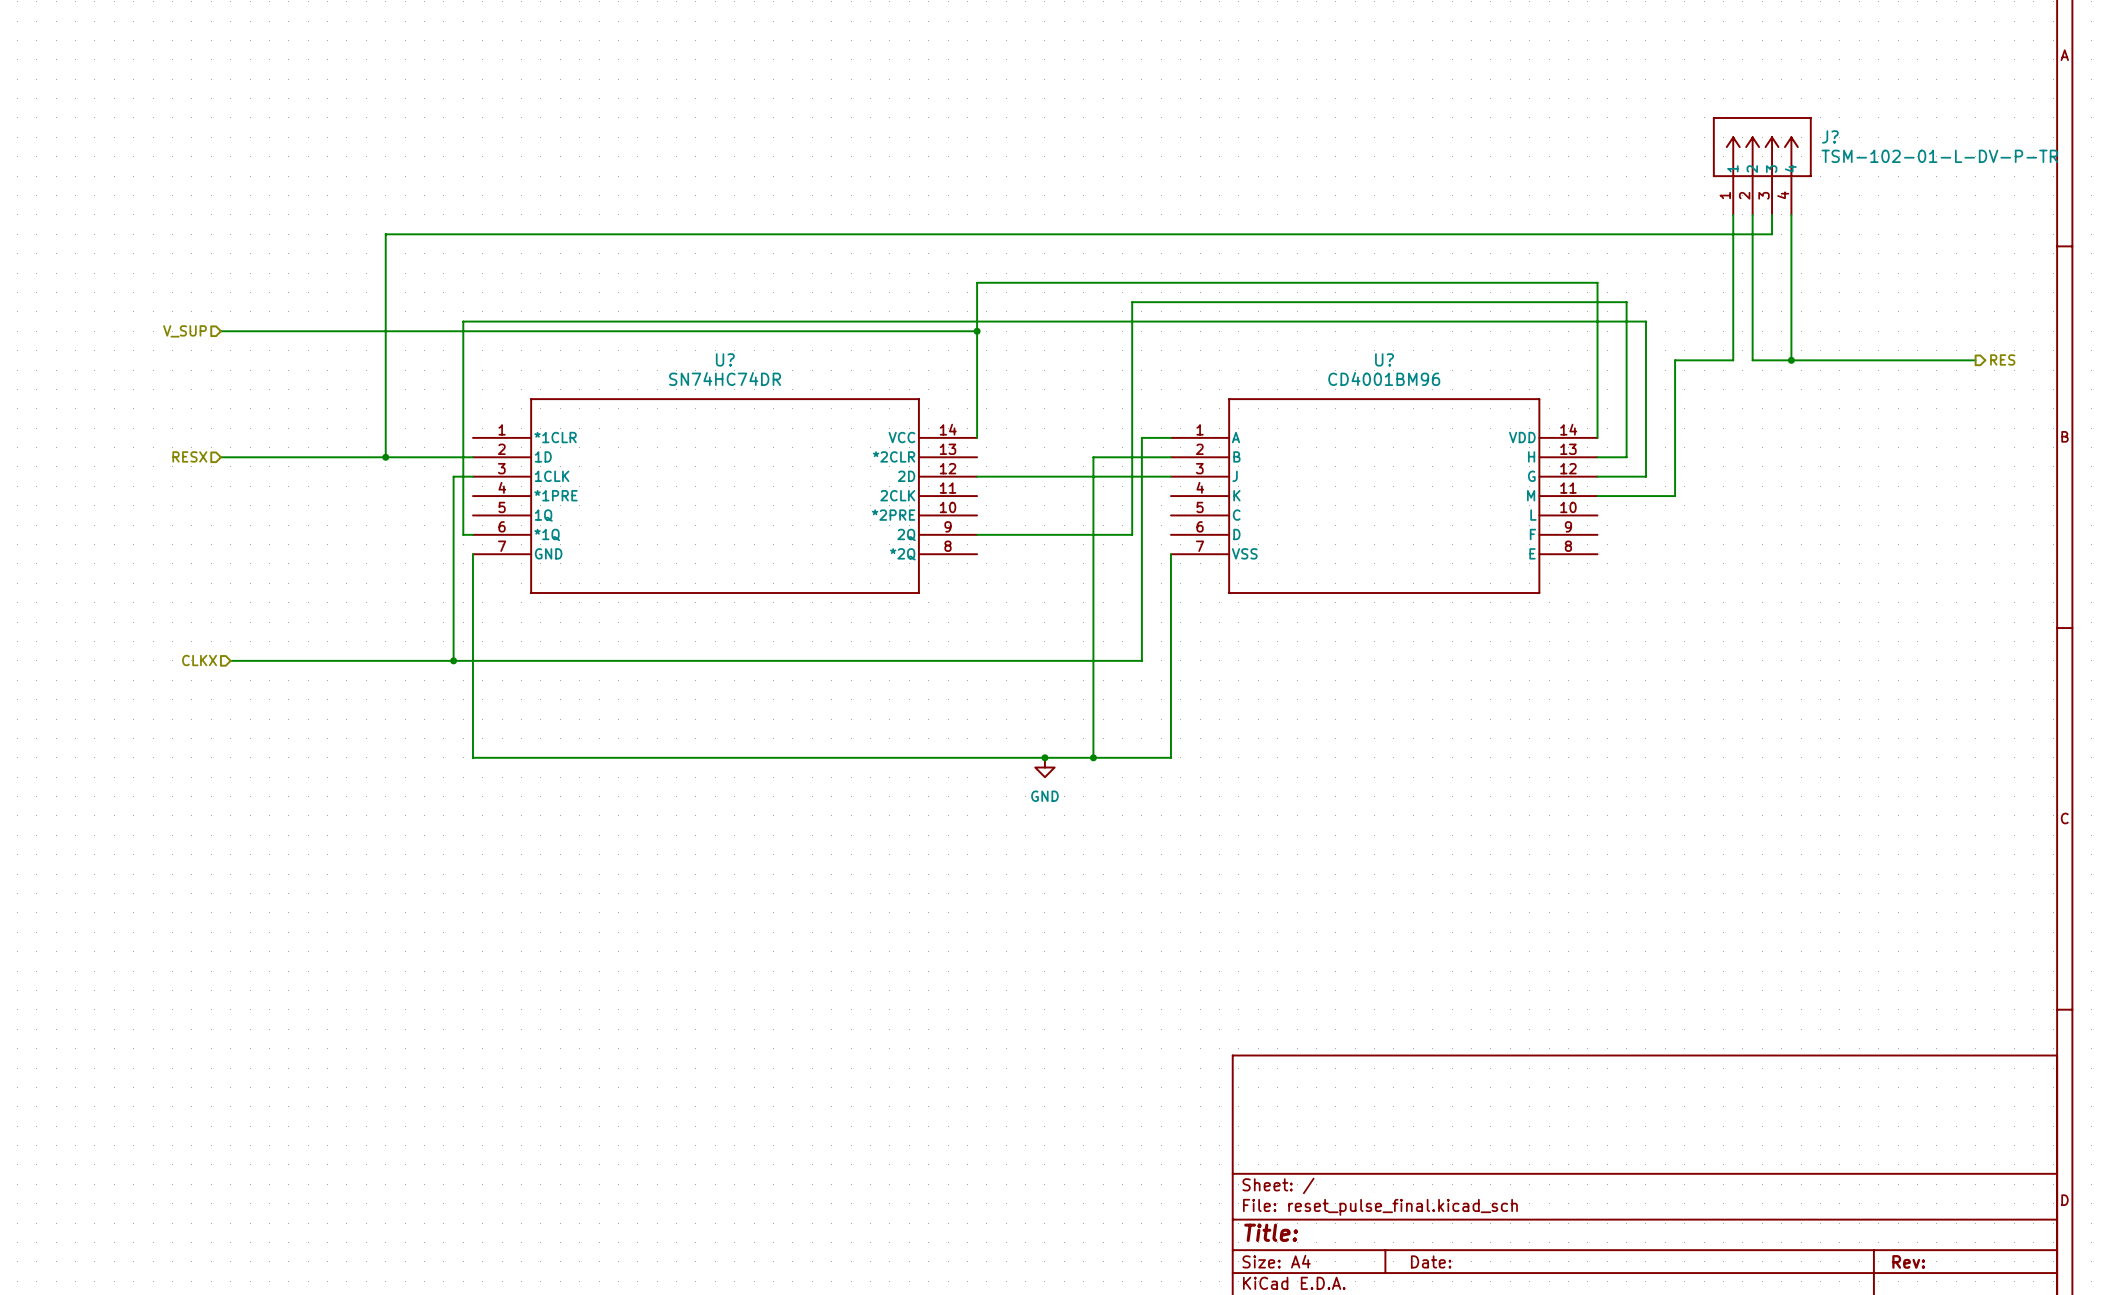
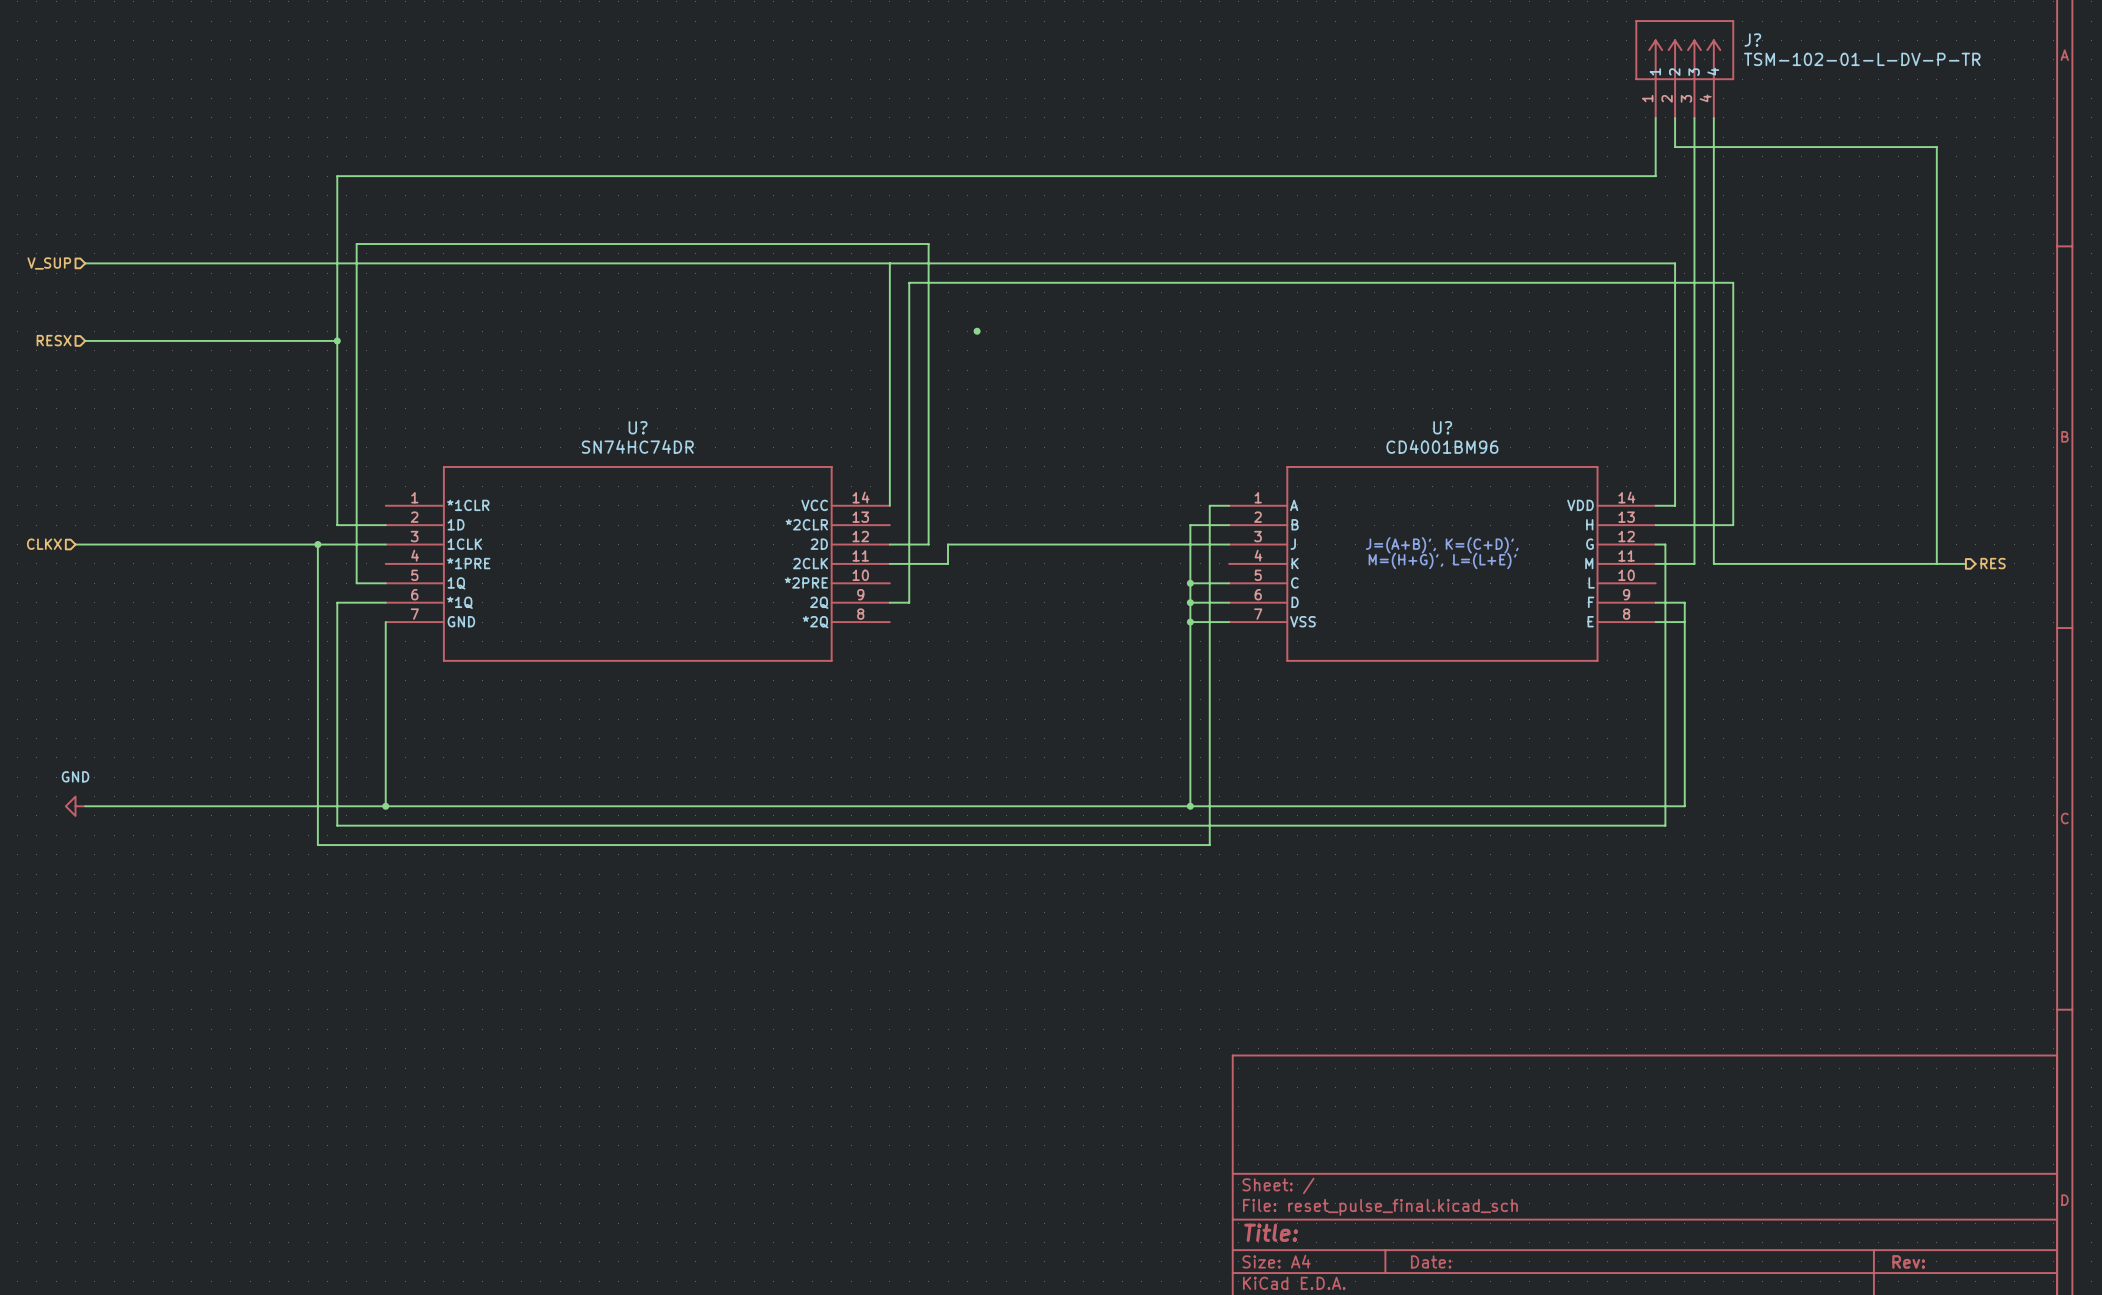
wire: none -> (1655, 117) (1655, 176) (337, 176) (337, 525) (385, 525)
wire: none -> (1675, 117) (1675, 147) (1936, 147) (1936, 563)
wire: none -> (1694, 117) (1694, 563) (1655, 563)
wire: none -> (1713, 117) (1713, 563) (1965, 563)
J? position: (1762, 166) -> (1684, 69)
wire: (1733, 214) (1733, 282) -> (1597, 282) (1733, 282)
wire: (1752, 214) (1752, 360) (1975, 360) -> none
wire: (1772, 214) (1772, 234) (385, 234) (385, 457) -> none
wire: (1791, 214) (1791, 360) -> none
wire: none -> (85, 263) (1675, 263) (1675, 360)
wire: none -> (889, 263) (889, 505)
wire: (977, 282) (977, 437) -> (977, 282) (909, 282) (909, 602) (889, 602)
wire: (1597, 282) (1597, 437) -> none
hierarchical label position: V_SUP (185, 331) -> V_SUP (49, 263)
wire: (220, 331) (977, 331) -> none
junction: none -> (337, 340)
hierarchical label: RES (2002, 359) -> none
wire: (1675, 360) (1733, 360) -> (1655, 525) (1733, 525) (1733, 360)
junction: (1791, 360) -> none
wire: (1170, 437) (1141, 437) (1141, 660) (230, 660) -> none
hierarchical label position: RESX (189, 456) -> RESX (54, 340)
wire: (220, 457) (472, 457) -> (85, 340) (337, 340)
junction: (385, 457) -> none
wire: (1170, 457) (1093, 457) (1093, 757) -> none
wire: (1597, 457) (1626, 457) (1626, 302) (1132, 302) (1132, 534) (977, 534) -> none
wire: (472, 476) (453, 476) (453, 660) -> none
wire: (977, 476) (1170, 476) -> none
wire: (1597, 476) (1645, 476) (1645, 321) (463, 321) (463, 534) (472, 534) -> none
U? position: (725, 496) -> (637, 563)
U? position: (1384, 496) -> (1442, 563)
wire: (1597, 496) (1675, 496) -> (1655, 505) (1675, 505) (1675, 496)
wire: none -> (1229, 505) (1209, 505) (1209, 845) (317, 845) (317, 544)
wire: none -> (1229, 525) (1190, 525) (1190, 806)
hierarchical label: none -> CLKX (44, 544)
wire: none -> (75, 544) (385, 544)
junction: none -> (317, 544)
wire: none -> (889, 544) (928, 544) (928, 244) (356, 244) (356, 583) (385, 583)
wire: none -> (1229, 544) (948, 544) (948, 563) (889, 563)
wire: none -> (1655, 544) (1665, 544) (1665, 825) (337, 825) (337, 602) (385, 602)
text: none -> J=(A+B)', K=(C+D)', (1442, 545)
wire: (472, 554) (472, 757) (1170, 757) (1170, 554) -> none
text: none -> M=(H+G)', L=(L+E)' (1442, 560)
hierarchical label: none -> RES (1993, 563)
wire: none -> (1190, 583) (1229, 583)
junction: none -> (1190, 583)
wire: none -> (1190, 602) (1229, 602)
junction: none -> (1190, 602)
wire: none -> (1655, 602) (1684, 602) (1684, 806) (85, 806)
wire: none -> (385, 622) (385, 806)
wire: none -> (1190, 622) (1229, 622)
junction: none -> (1190, 622)
wire: none -> (1655, 622) (1684, 622)
hierarchical label: CLKX (199, 660) -> none
junction: (453, 660) -> none
junction: (1044, 757) -> none
junction: (1093, 757) -> none
power symbol: GND (1044, 767) -> none
power symbol: none -> GND (75, 806)
junction: none -> (385, 806)
junction: none -> (1190, 806)

